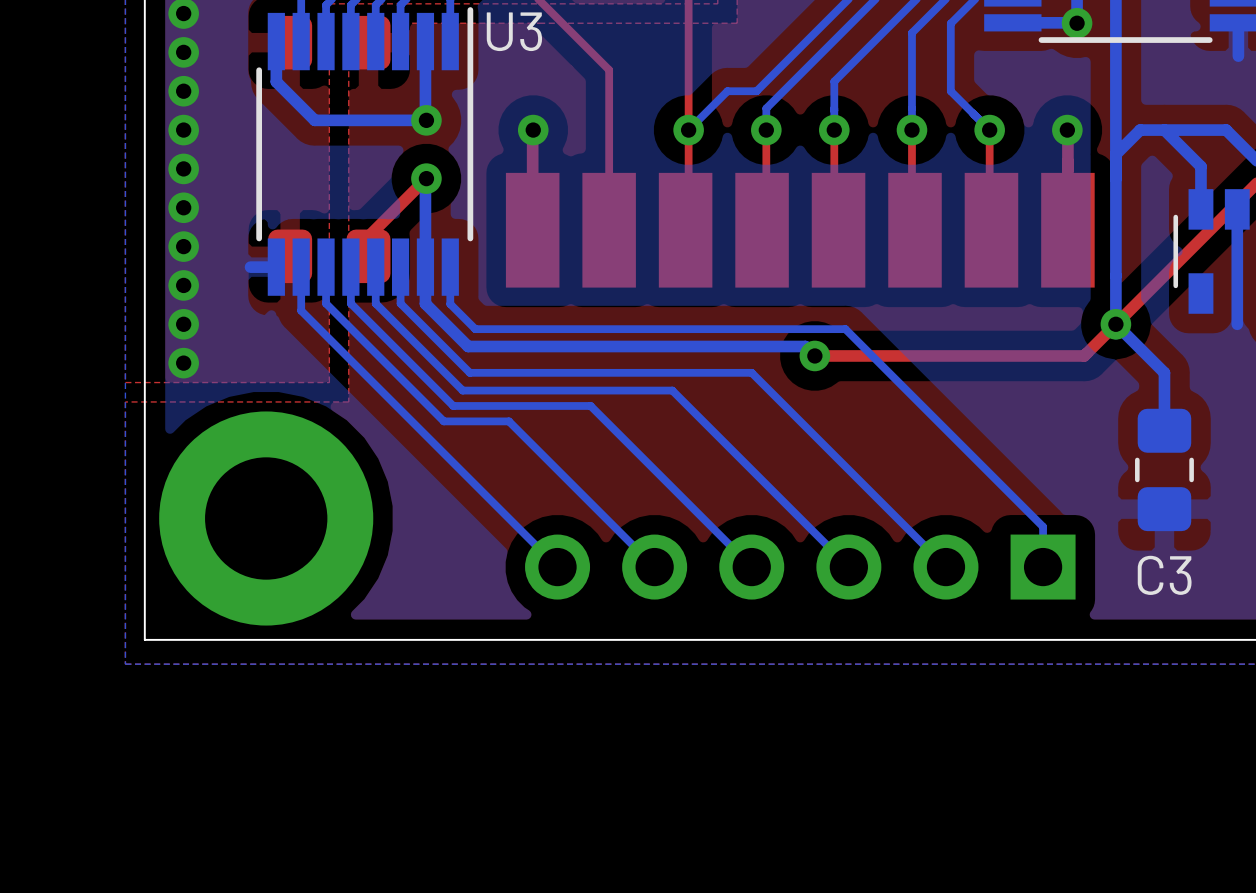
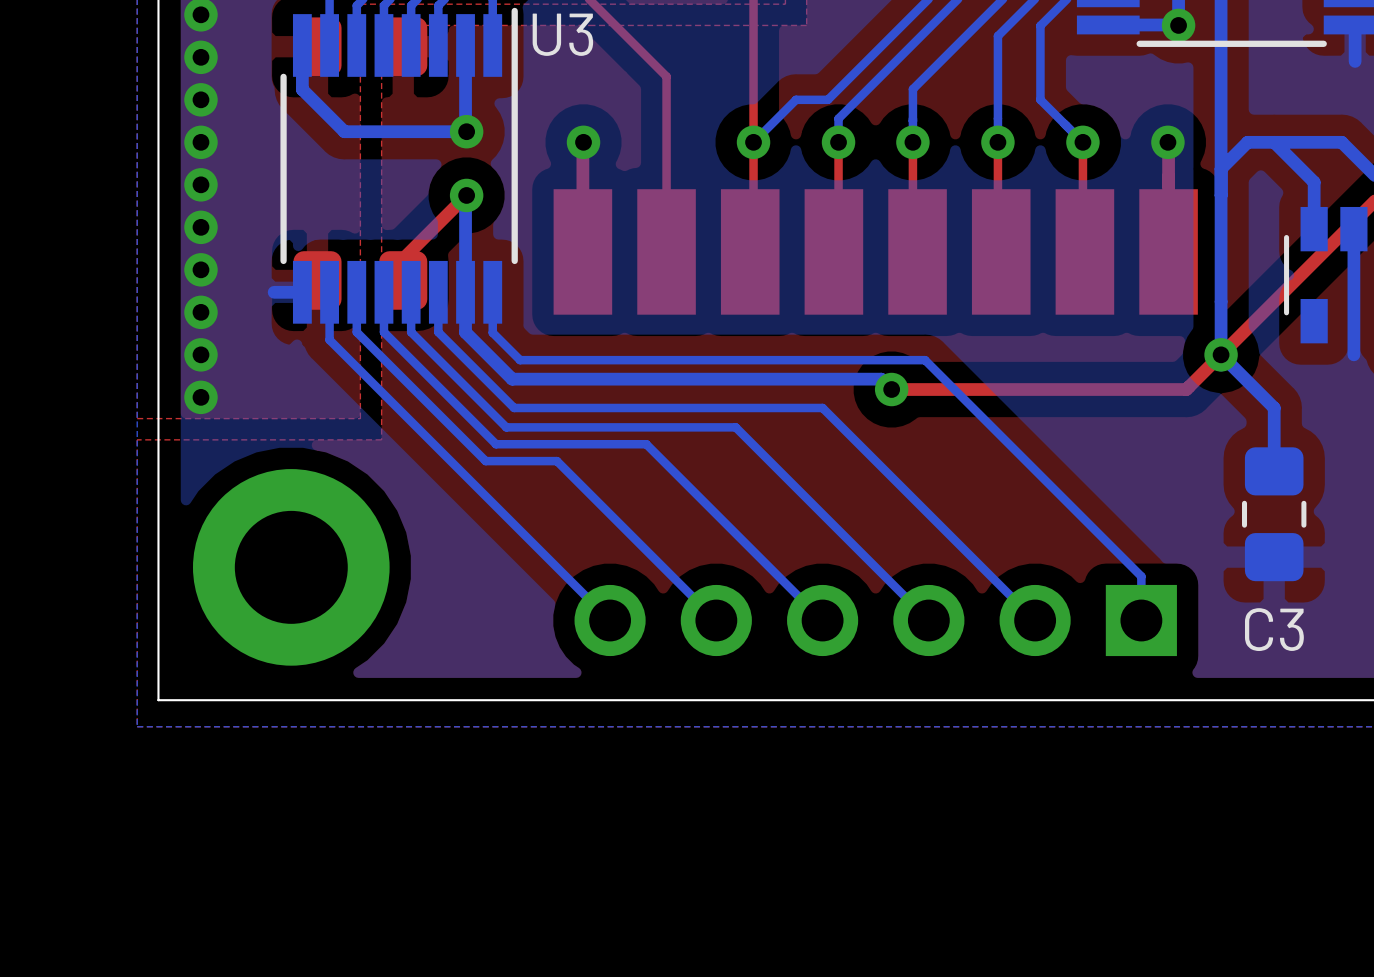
part footprint: [159, 411, 374, 626] -> [192, 469, 390, 666]

